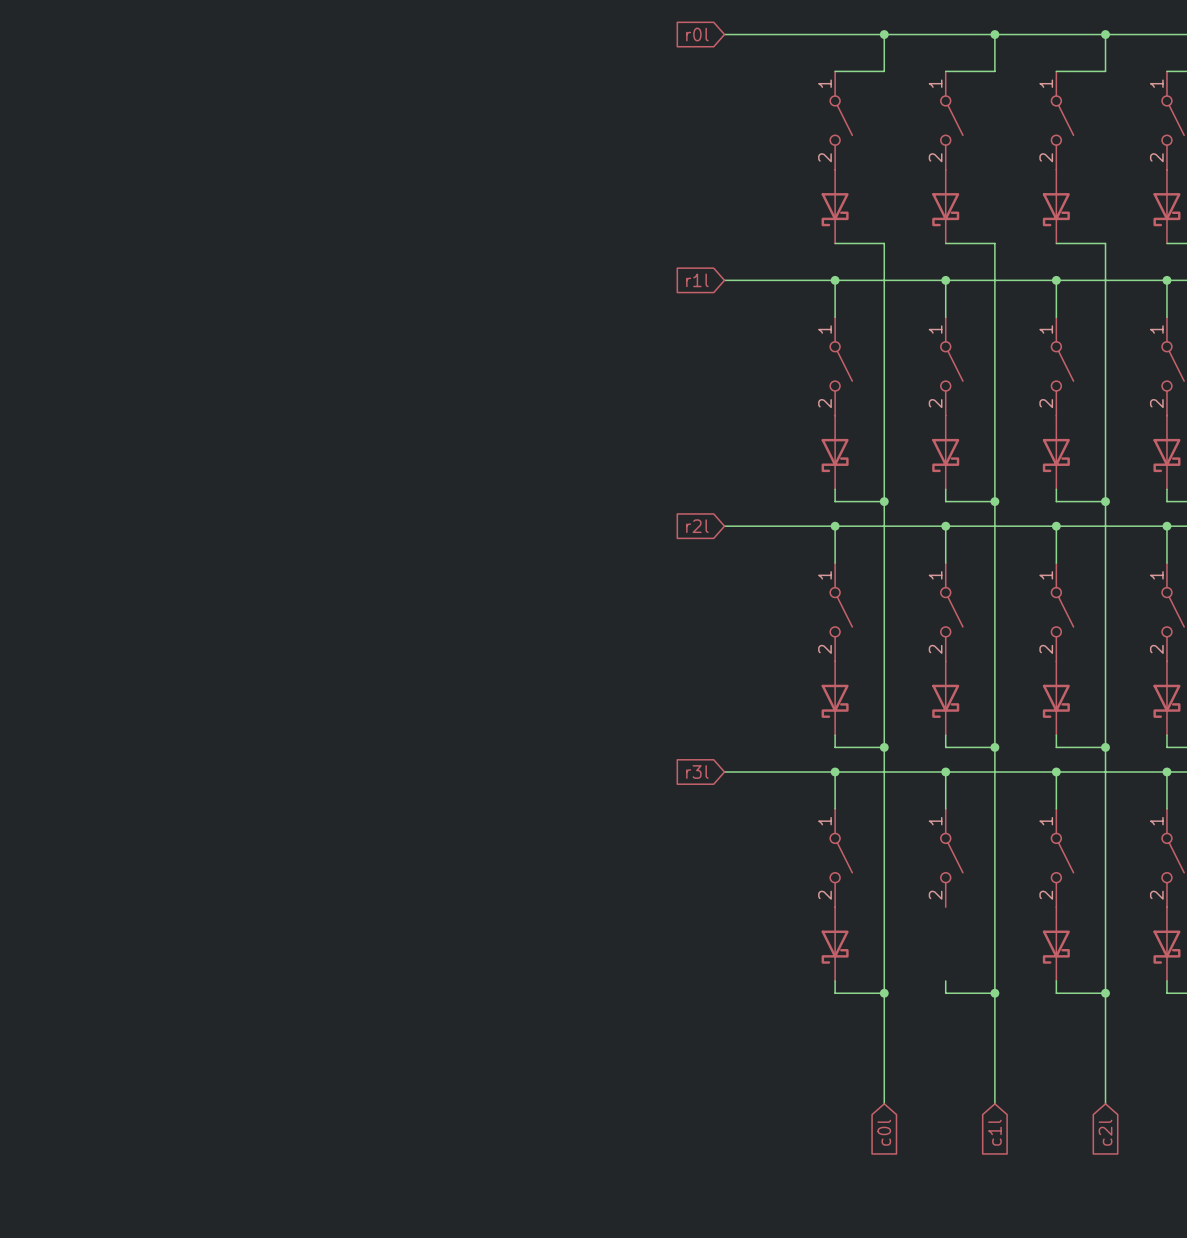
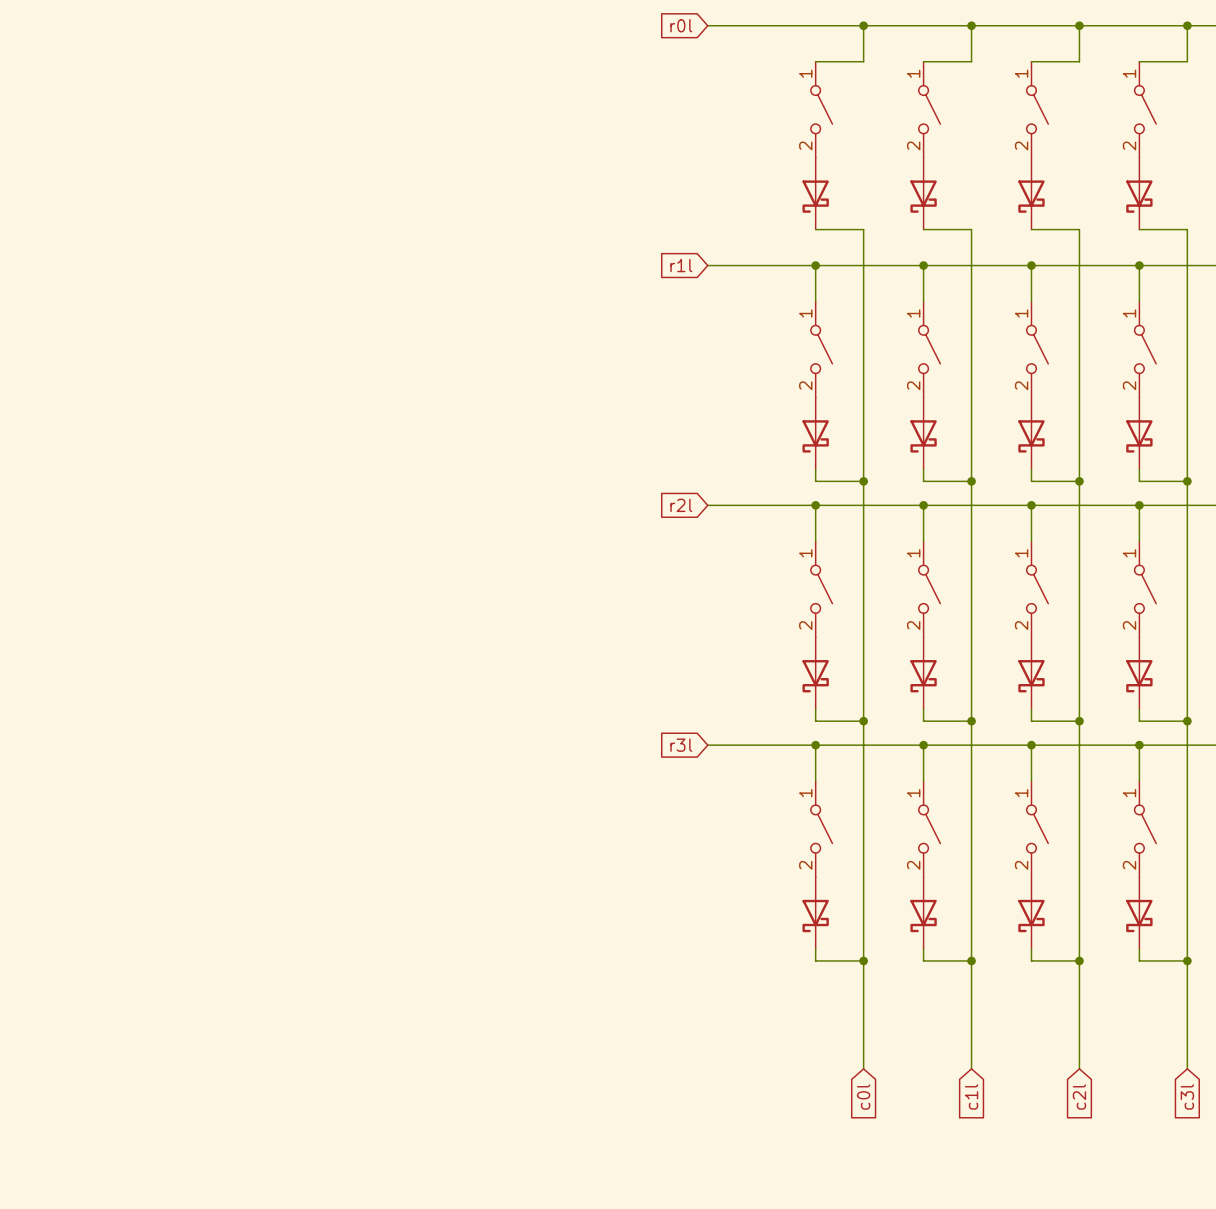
part: none -> (923, 913)

